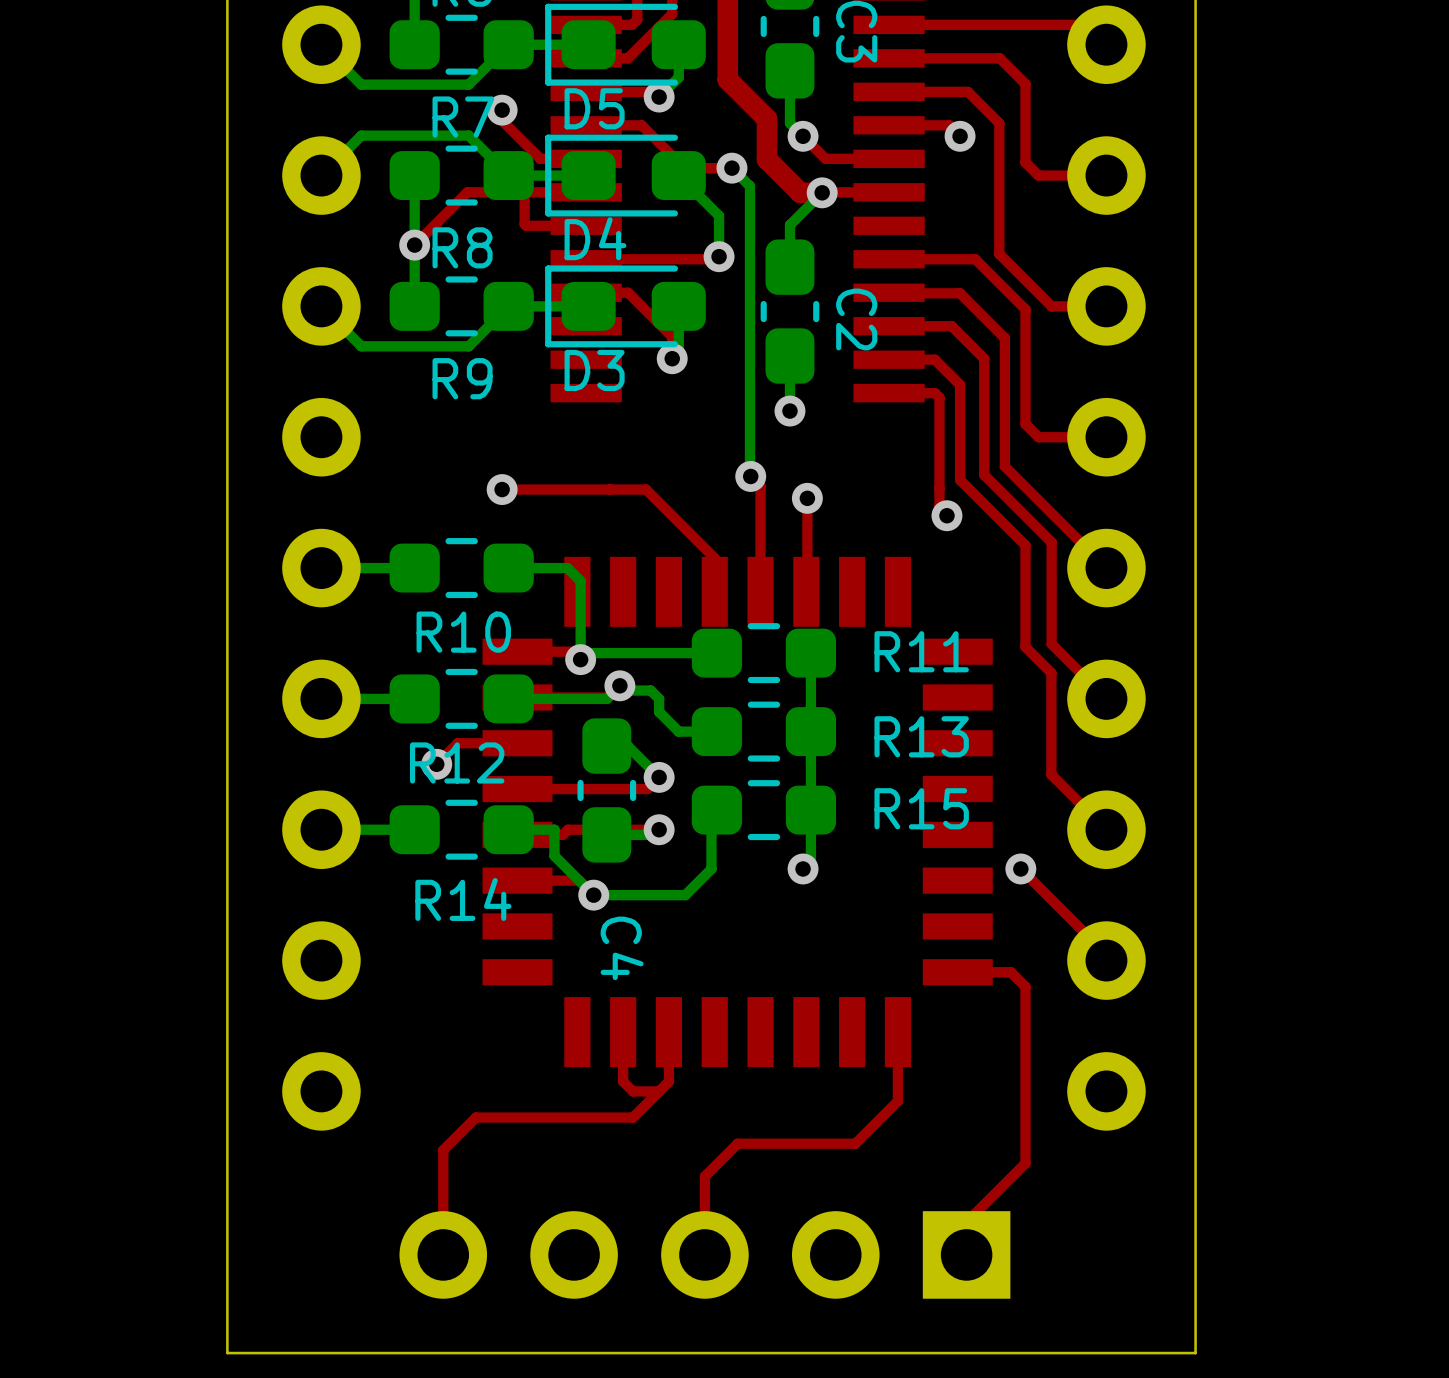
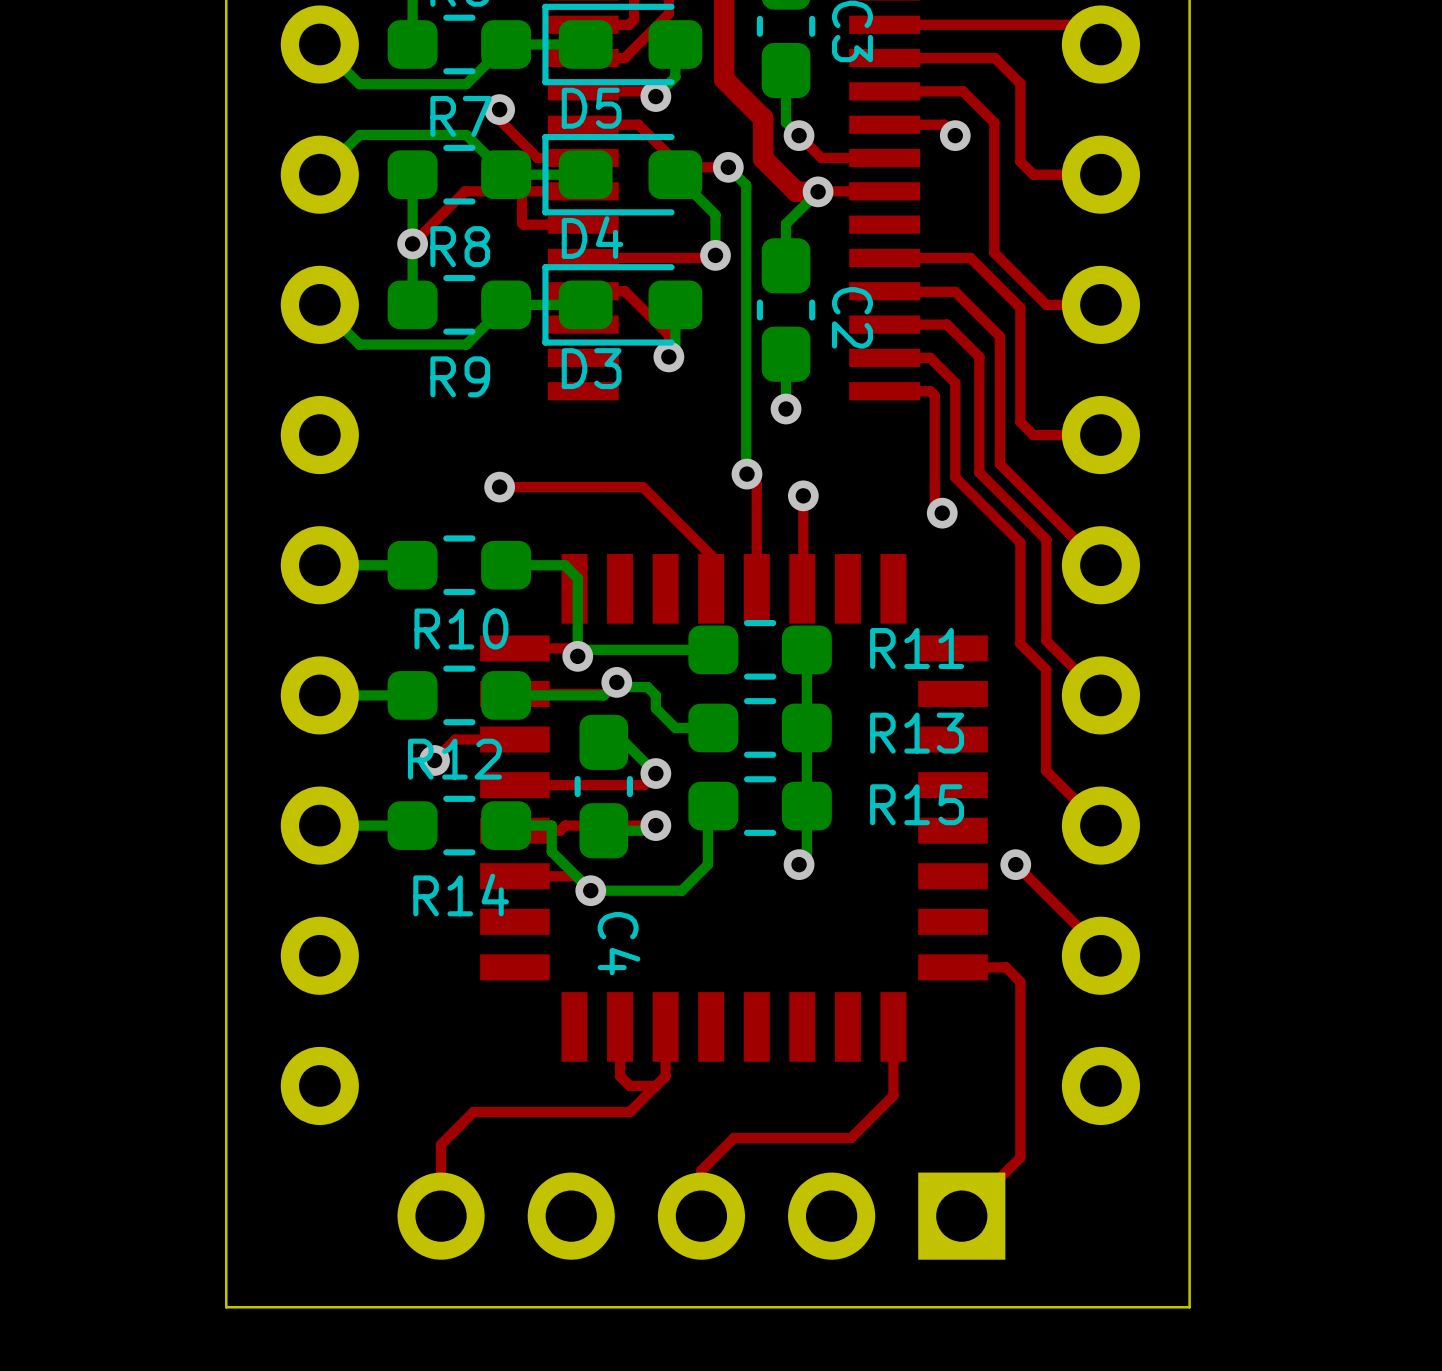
part position: (704, 1254) -> (701, 1216)
board edge: (1195, 1313) (1195, 1353) (227, 1353) (227, 1313) -> (1189, 1307) (226, 1307)

